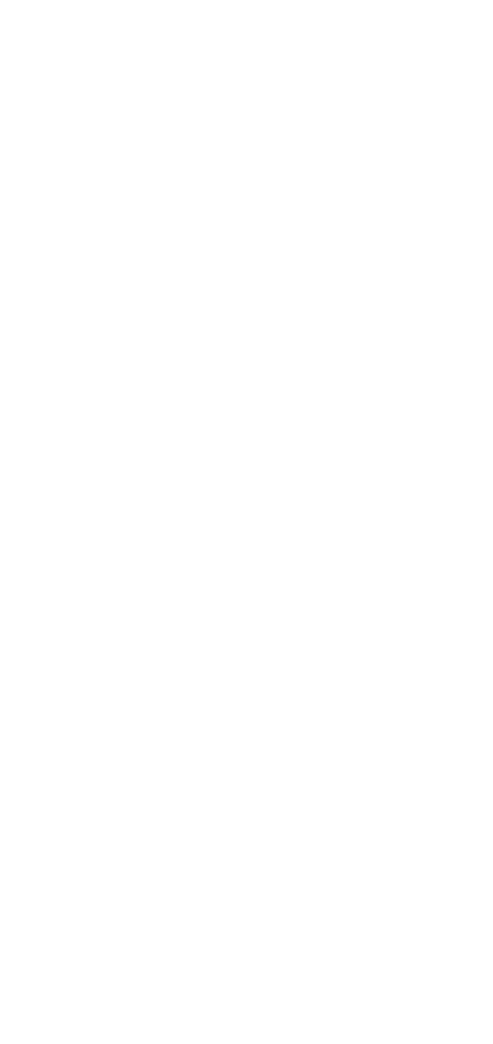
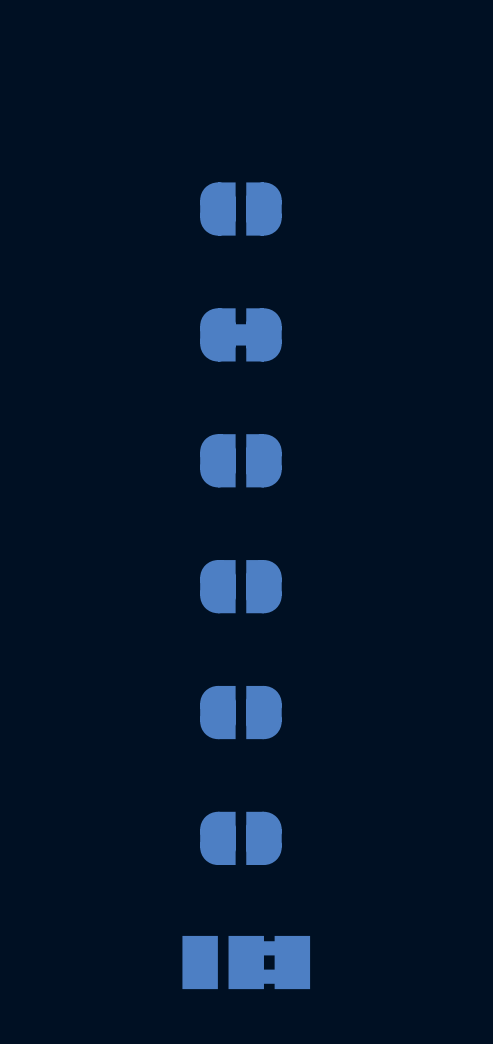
part: none -> (240, 209)
part: none -> (240, 334)
part: none -> (240, 460)
part: none -> (240, 586)
part: none -> (240, 712)
part: none -> (240, 838)
part: none -> (246, 962)

